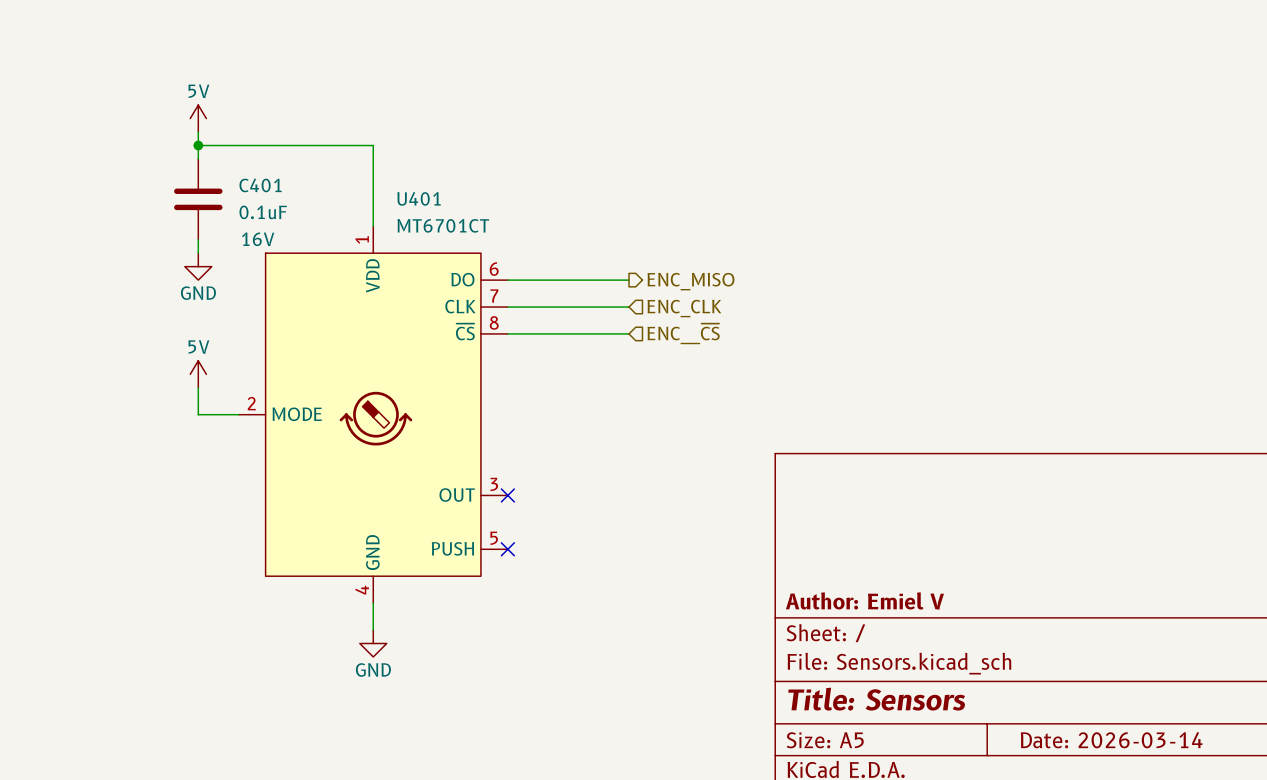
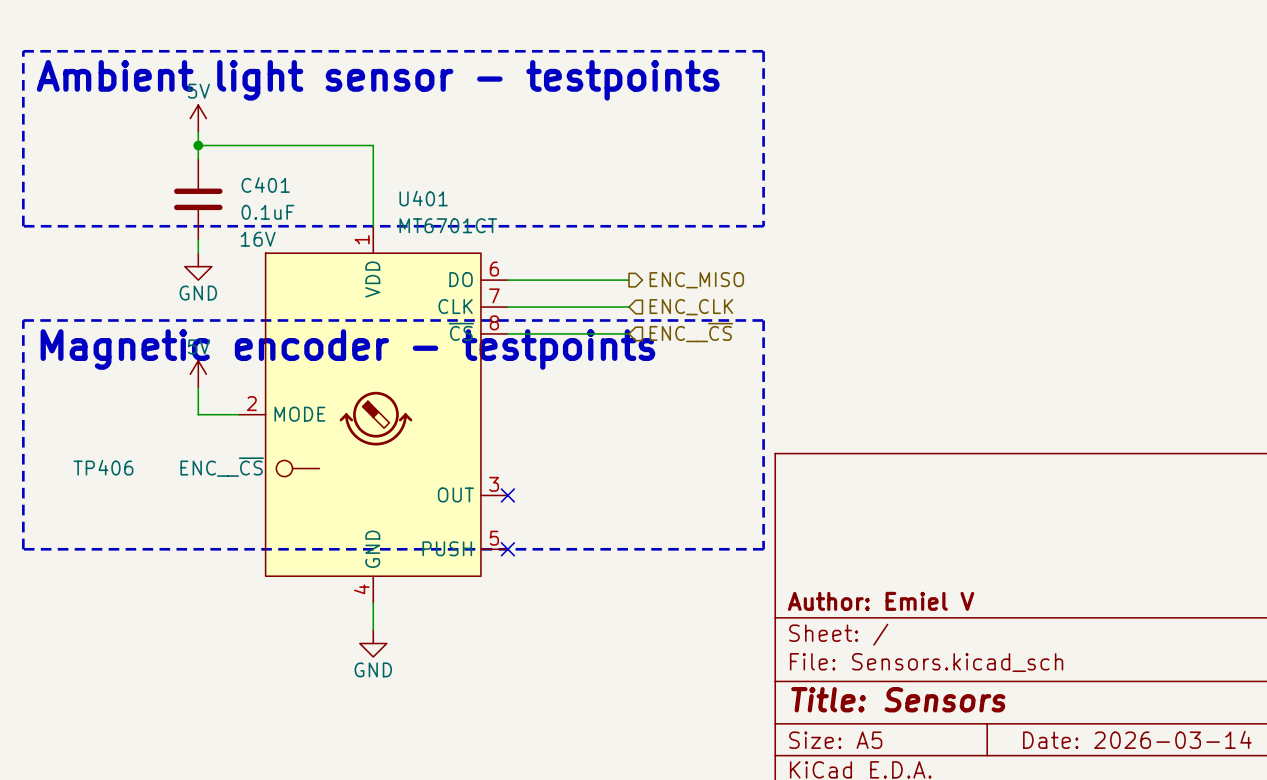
line: none -> (23, 51) (23, 226) (763, 226) (763, 51) (23, 51)
text: none -> Ambient light sensor - testpoints (378, 80)
line: none -> (23, 320) (763, 320) (763, 549) (23, 549) (23, 320)
text: none -> Magnetic encoder - testpoints (347, 349)
TP406: none -> ENC__~{CS} (297, 468)

